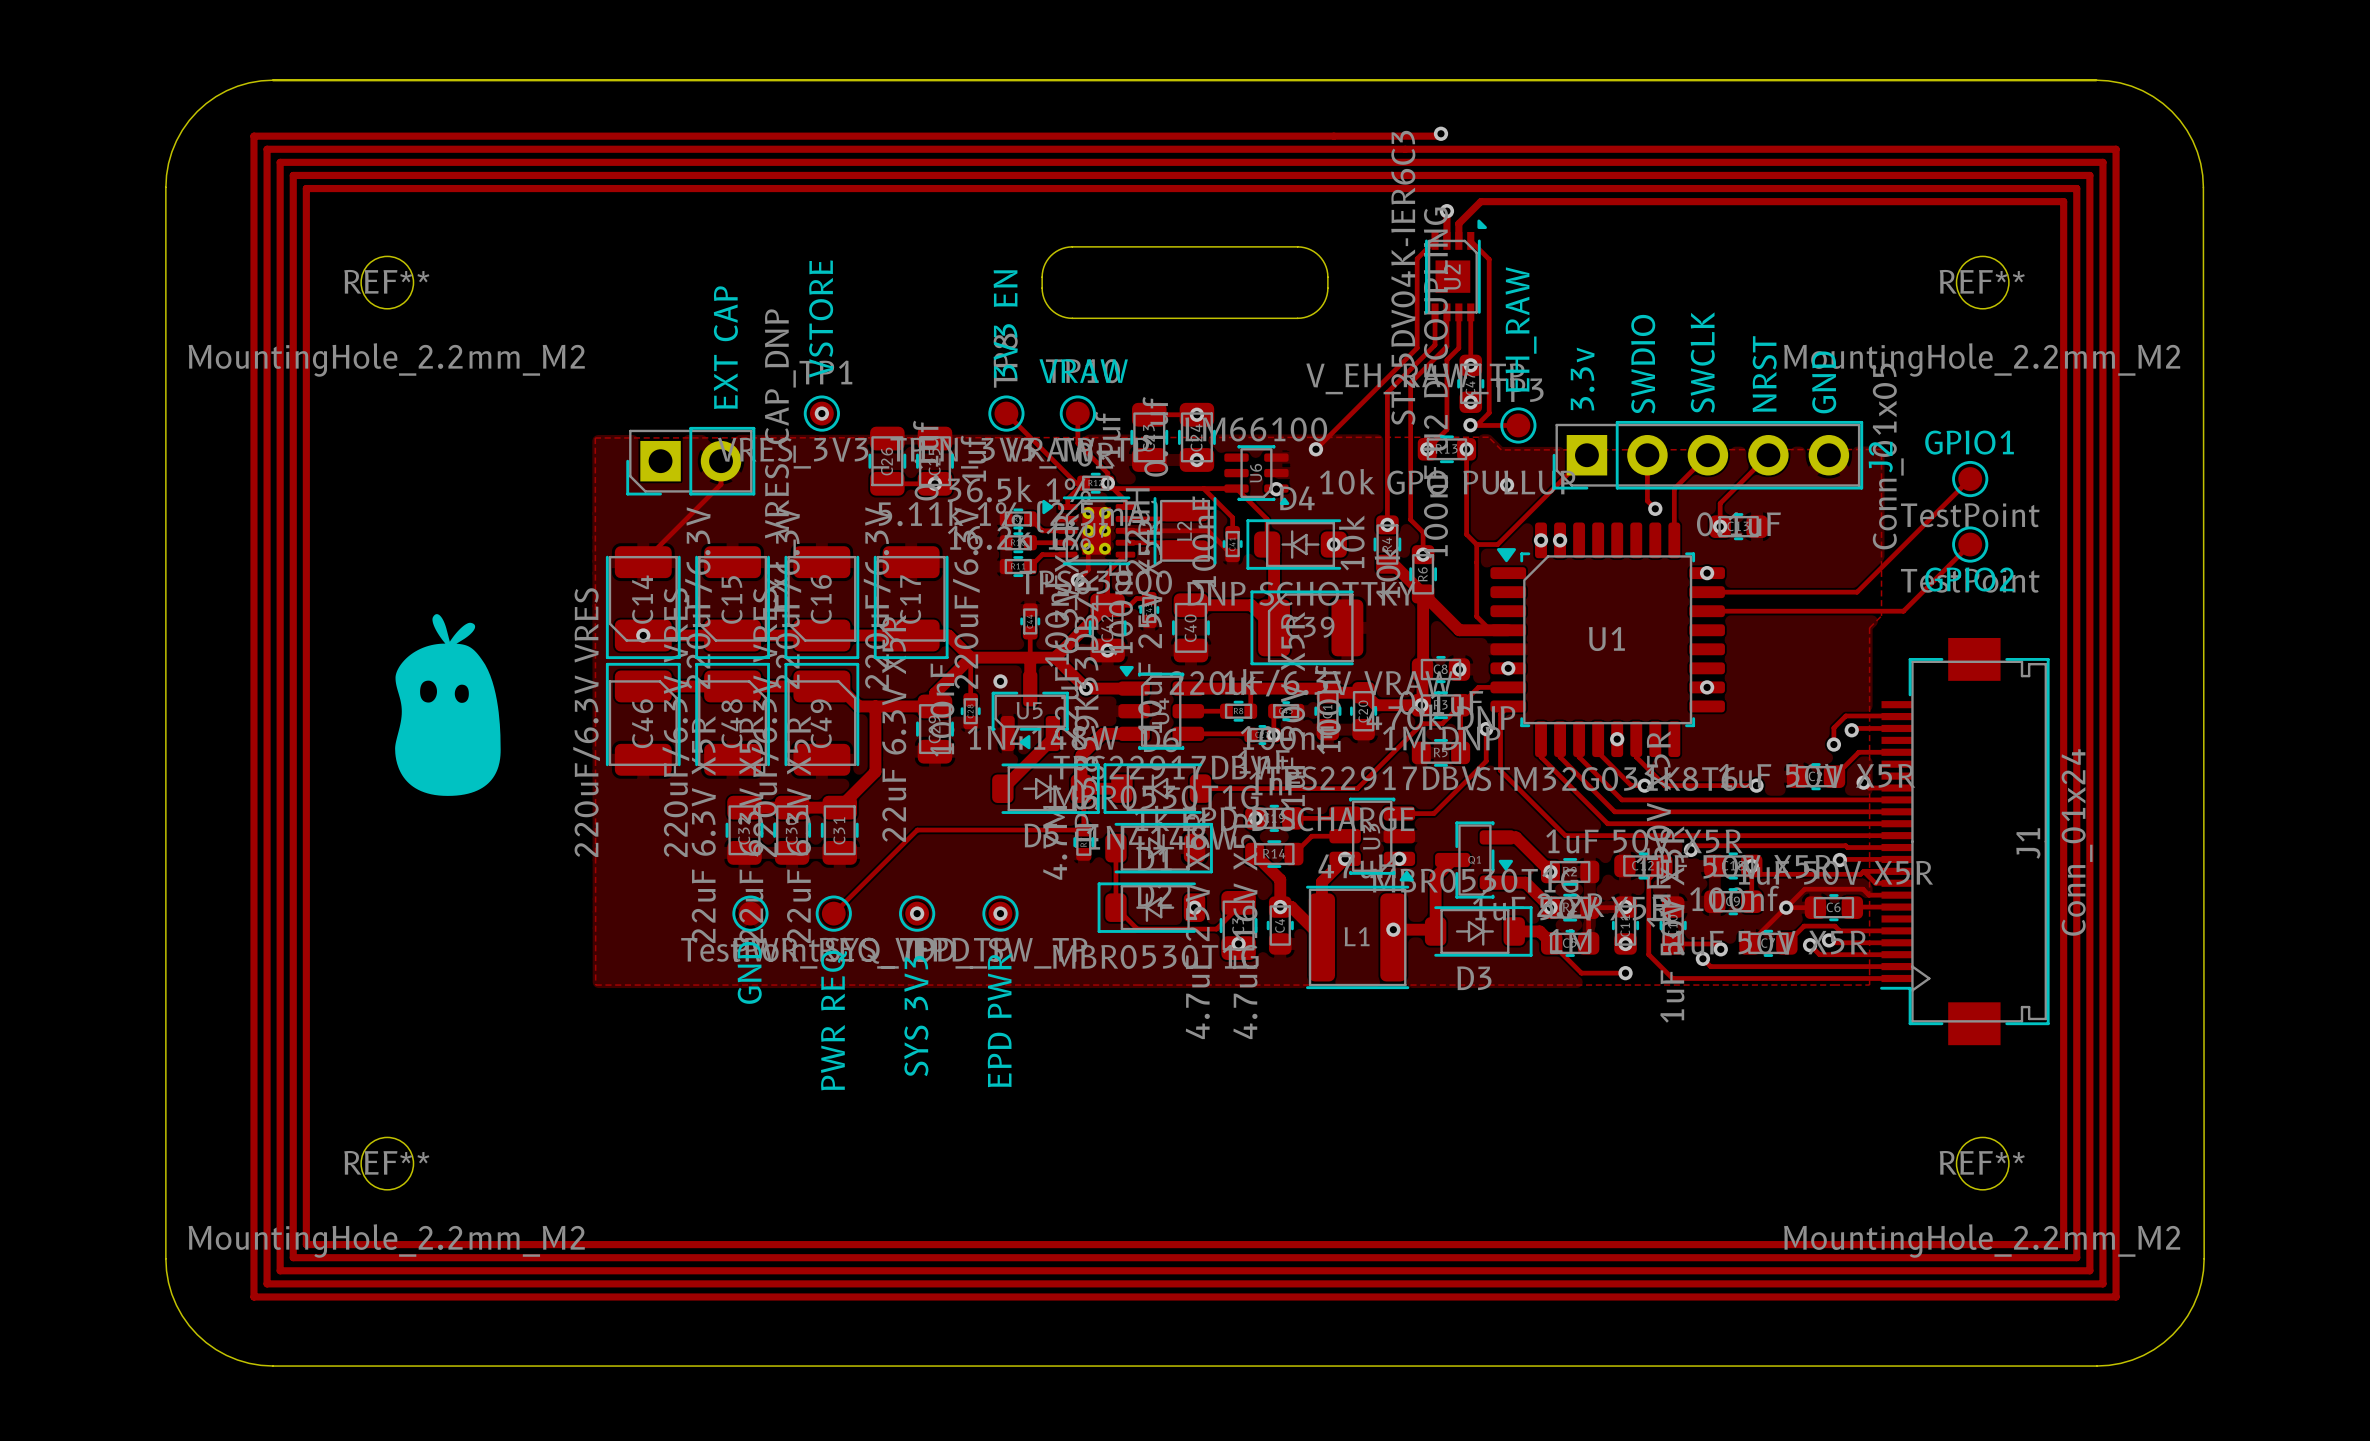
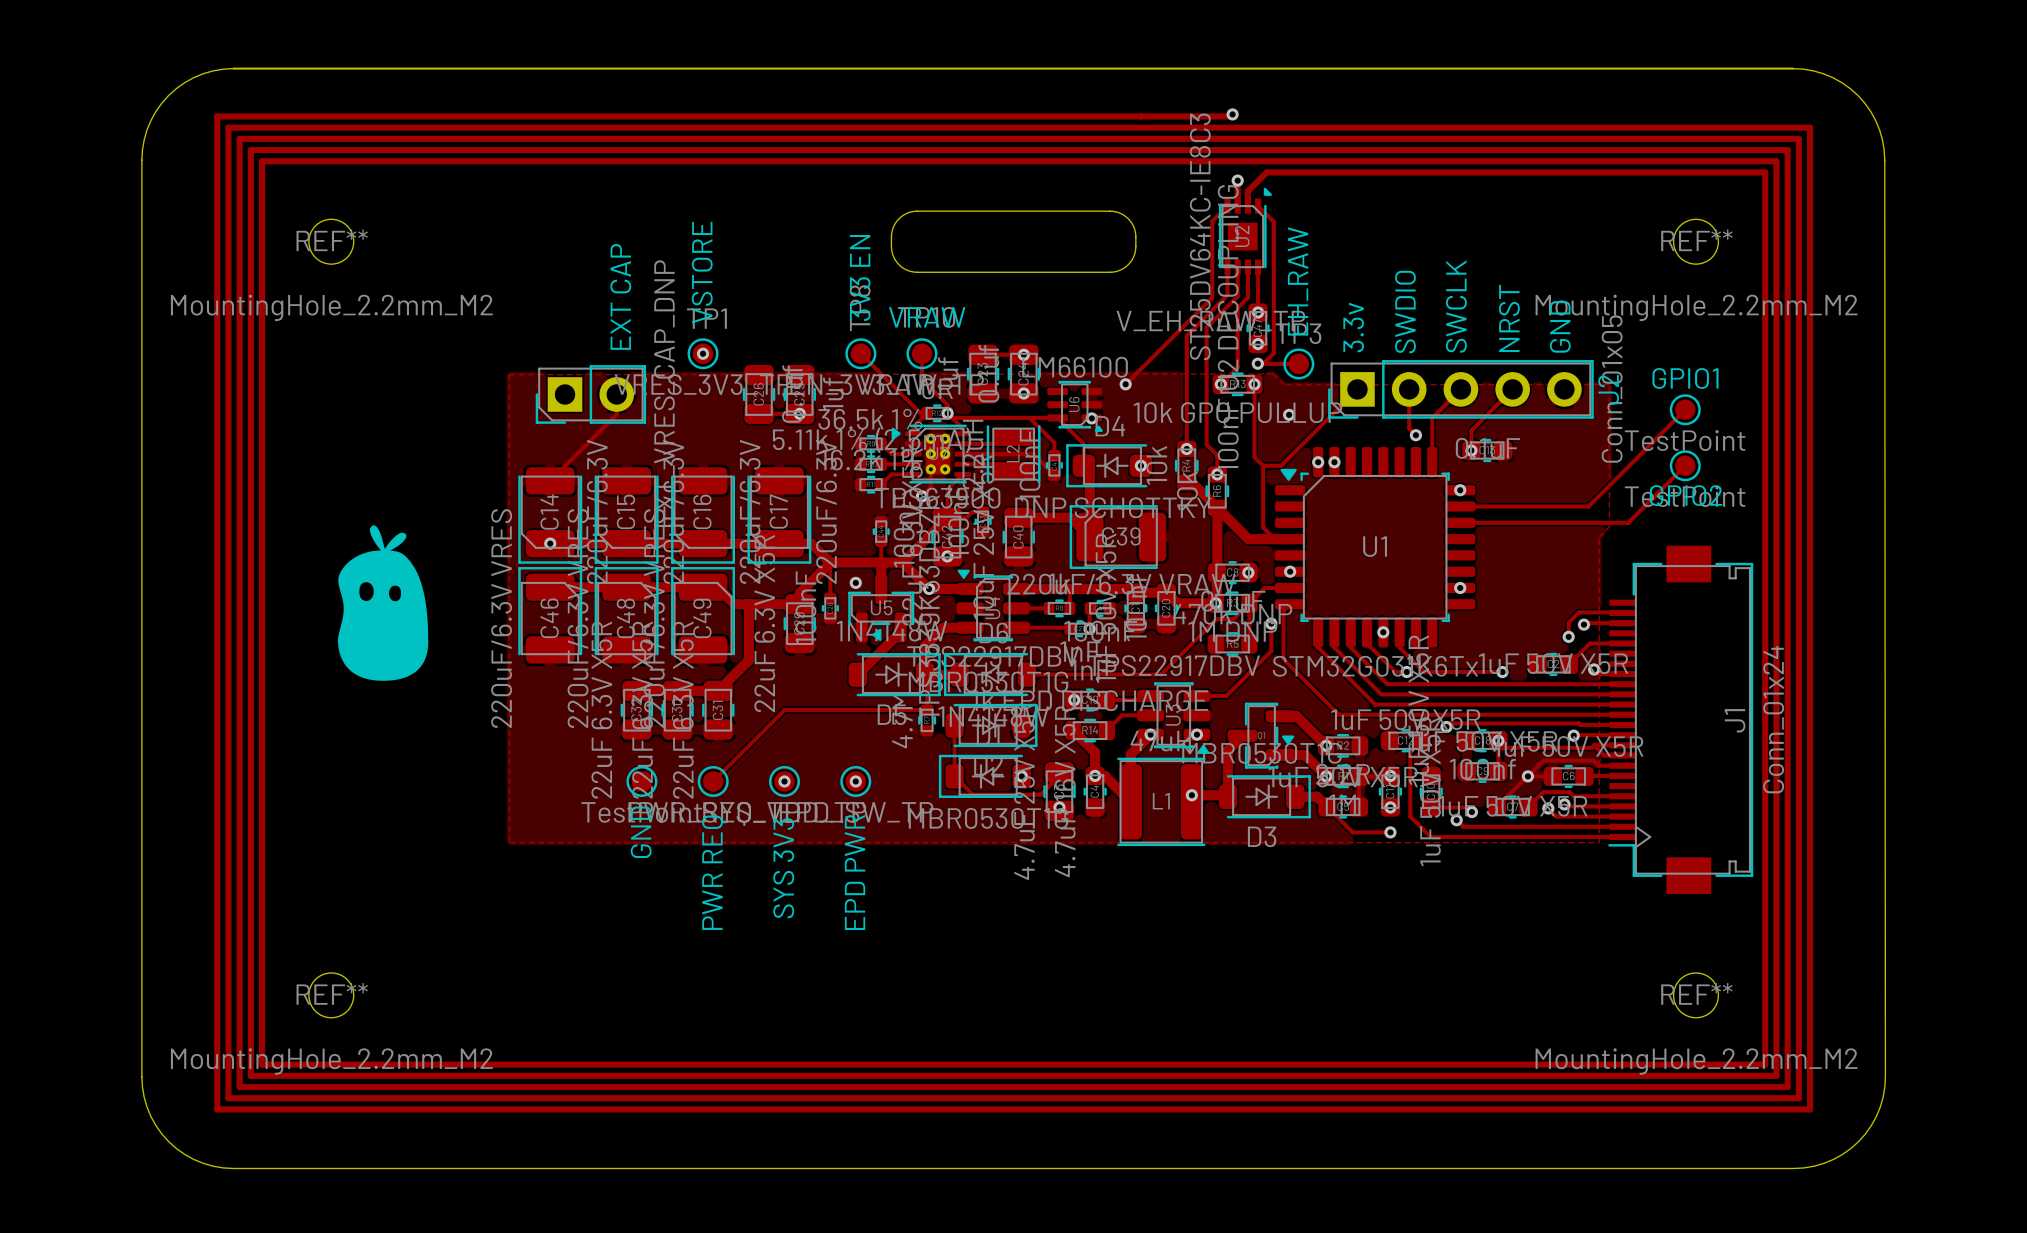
U2 value: ST25DV04K-IER6C3 (1403, 277) -> ST25DV64KC-IE8C3 (1200, 236)
U1 value: STM32G031K8T6 (1606, 779) -> STM32G031K6Tx (1375, 666)

